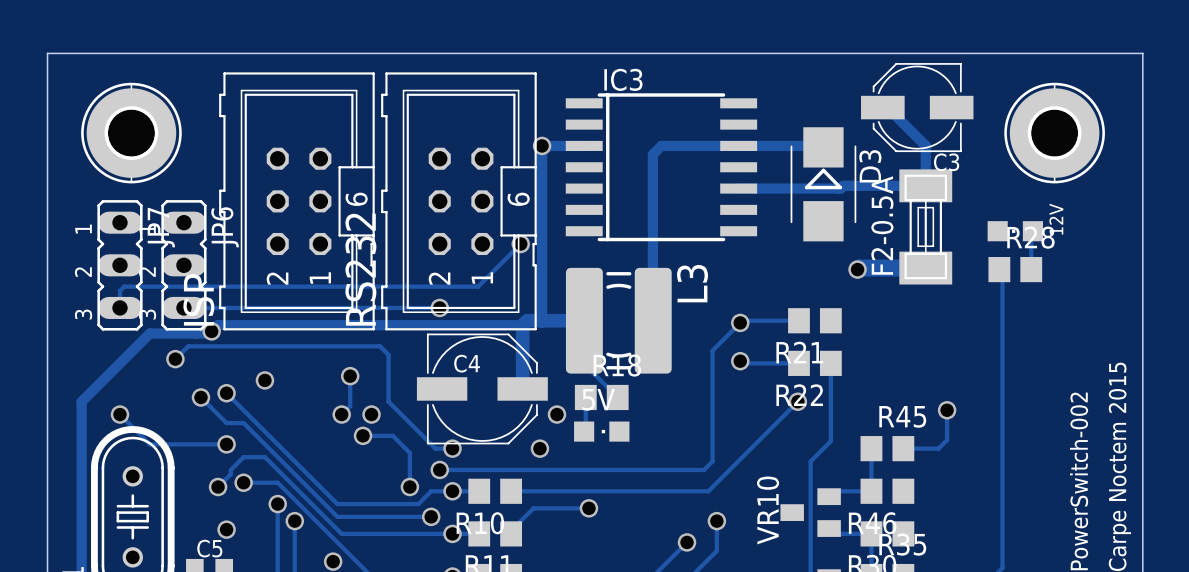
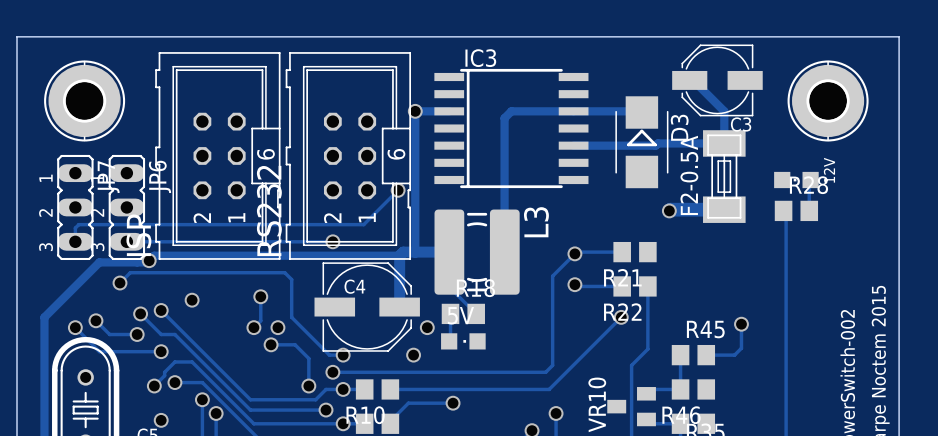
track: none -> (95, 320) (109, 334) (137, 334)
via: none -> (95, 320)
via: none -> (137, 334)

